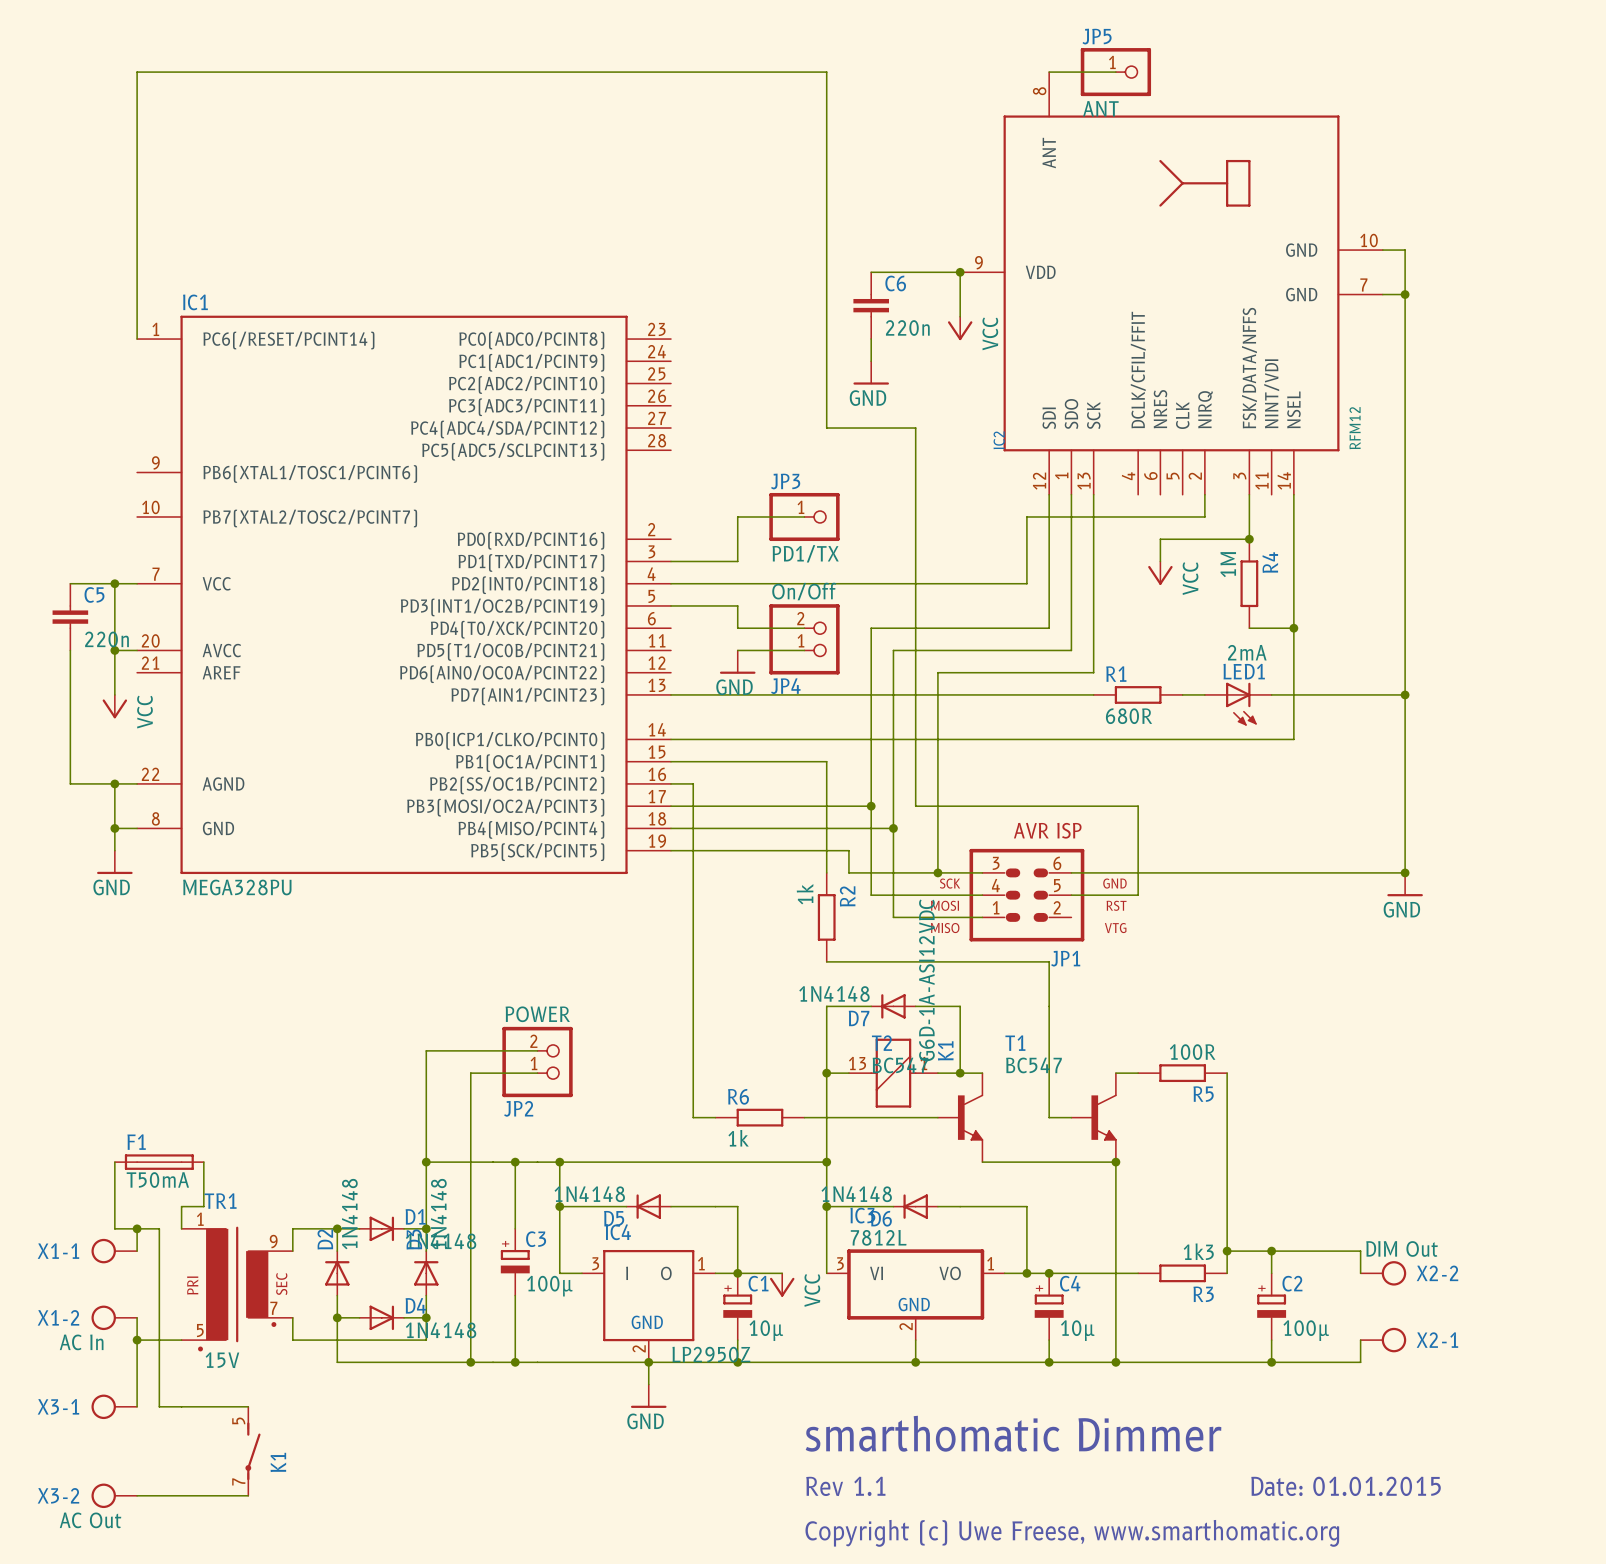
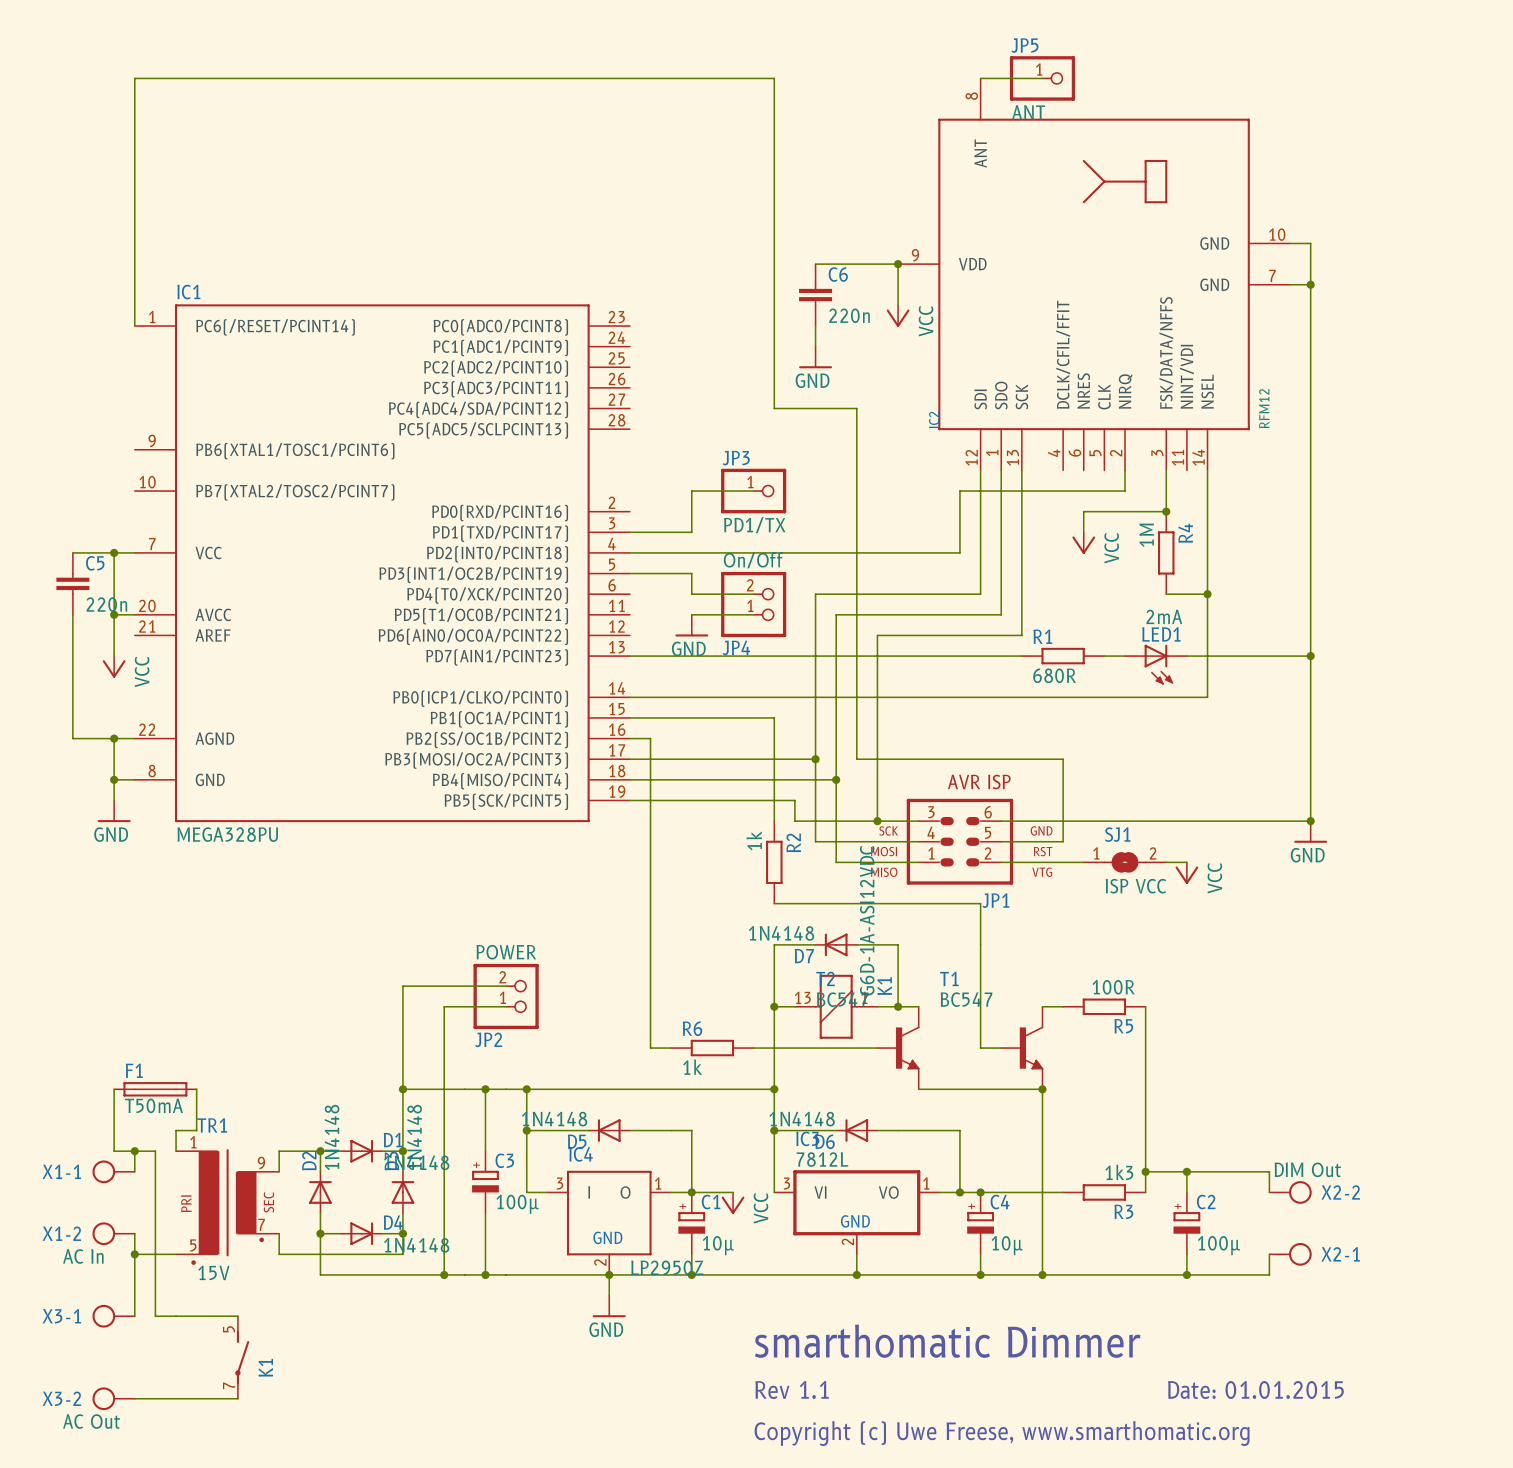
wire: none -> (1001, 862) (1083, 862)
SJ1: none -> ISP VCC (1125, 862)
wire: none -> (1166, 862) (1186, 862)
power symbol: none -> VCC (1186, 873)

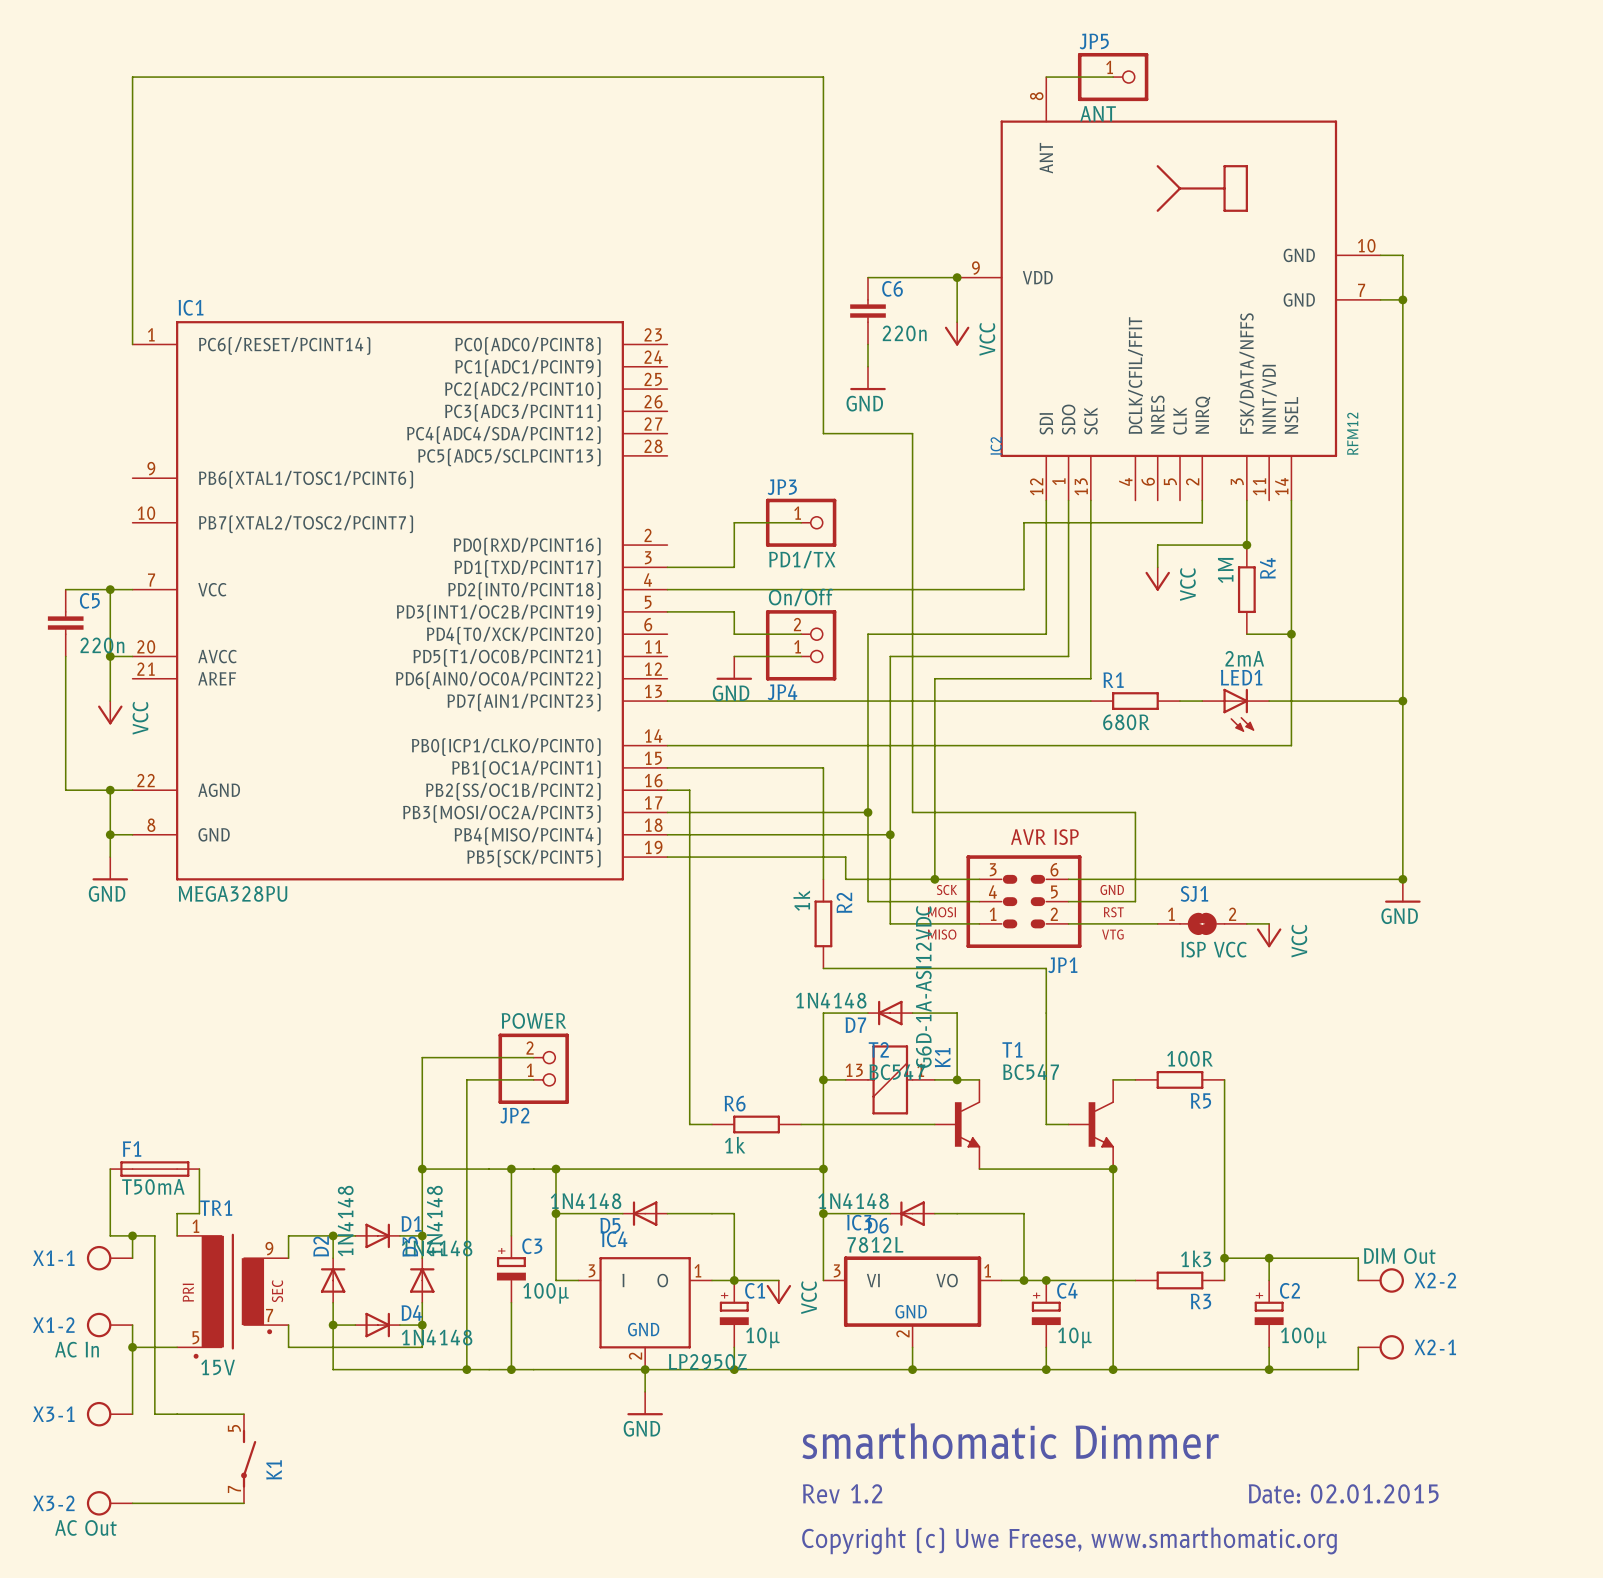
text: Rev 1.1 (792, 1389) -> Rev 1.2 (842, 1493)
text: Date: 01.01.2015 (1255, 1389) -> Date: 02.01.2015 (1343, 1493)

